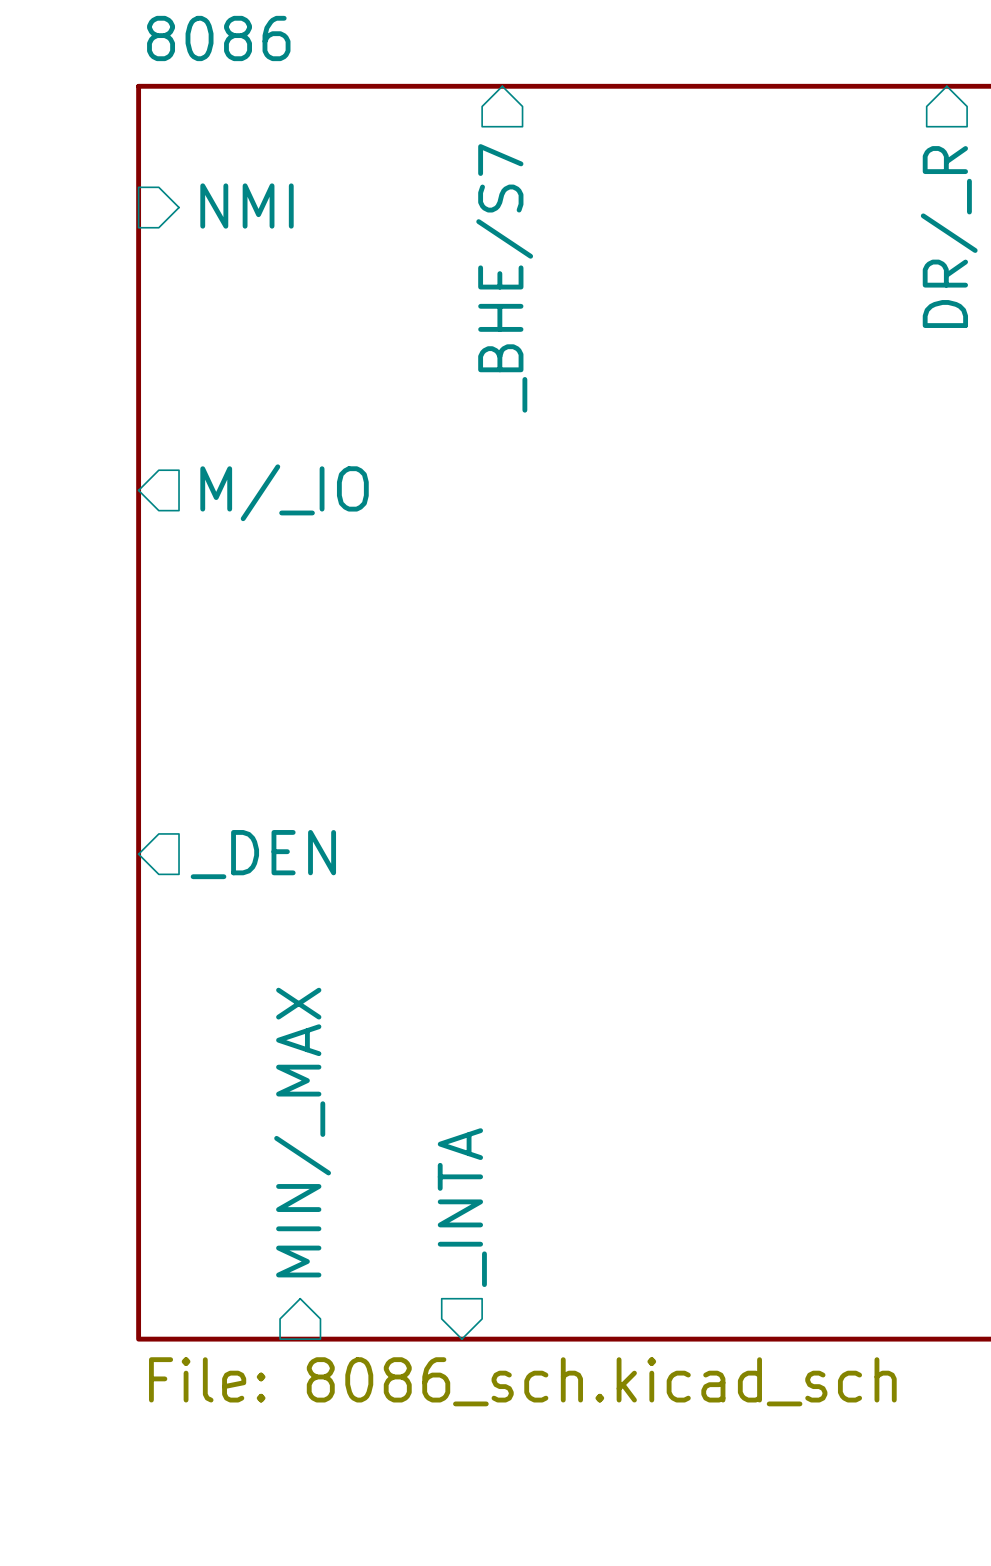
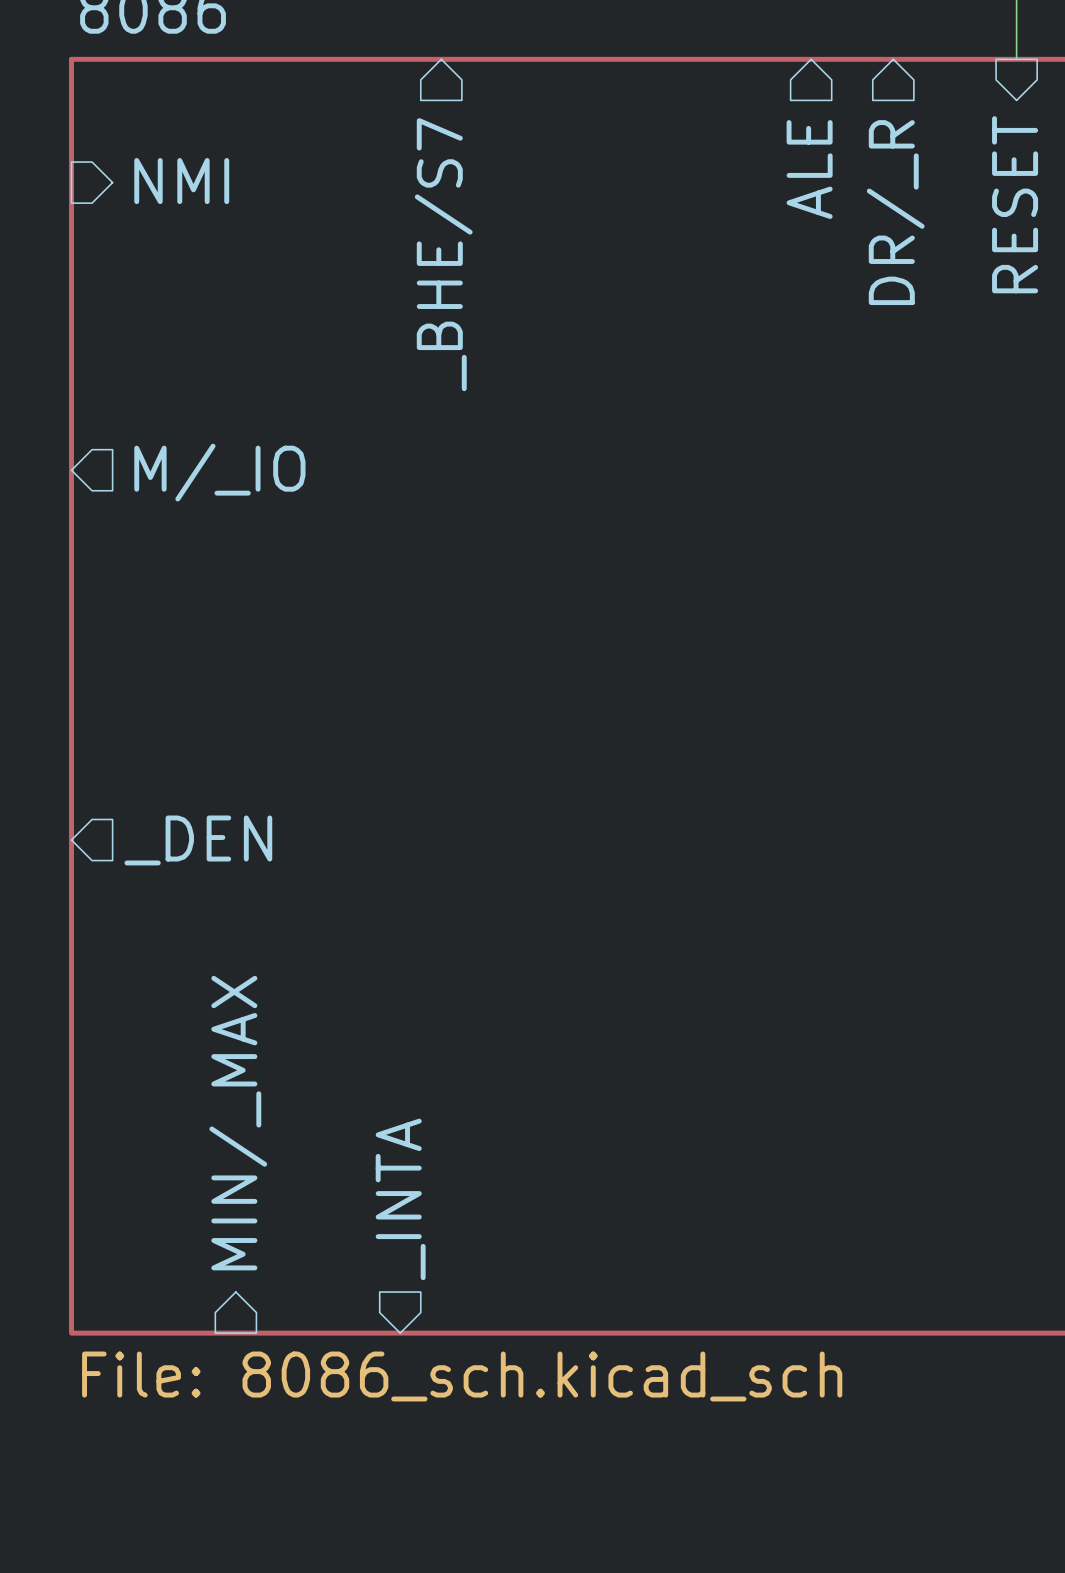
sheet pin: none -> ALE (809, 169)

